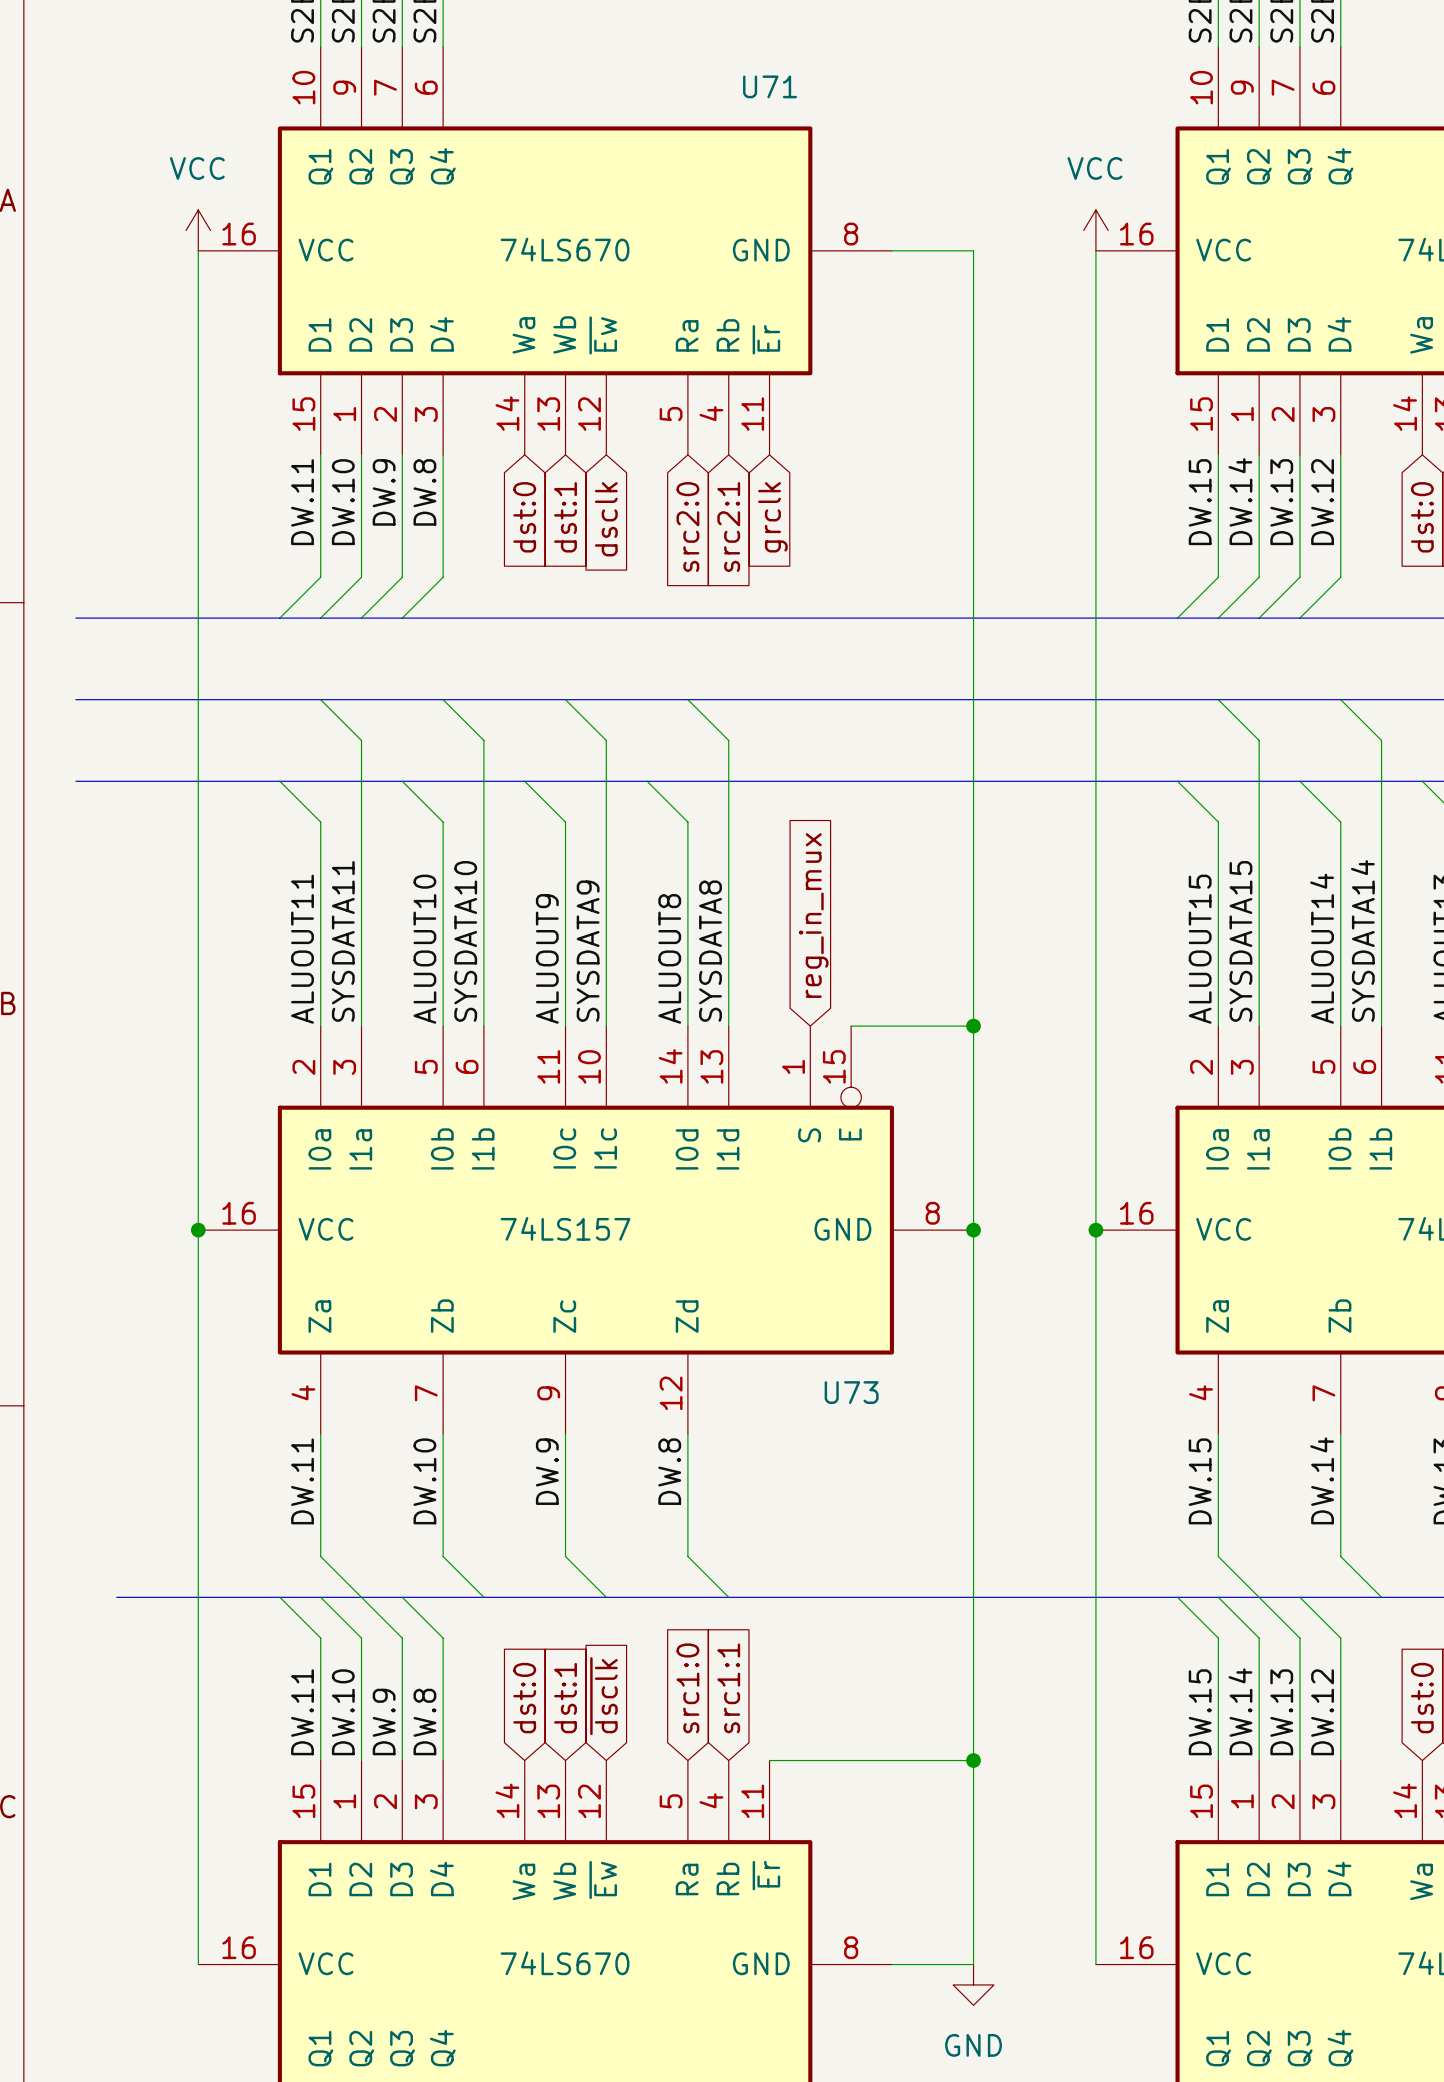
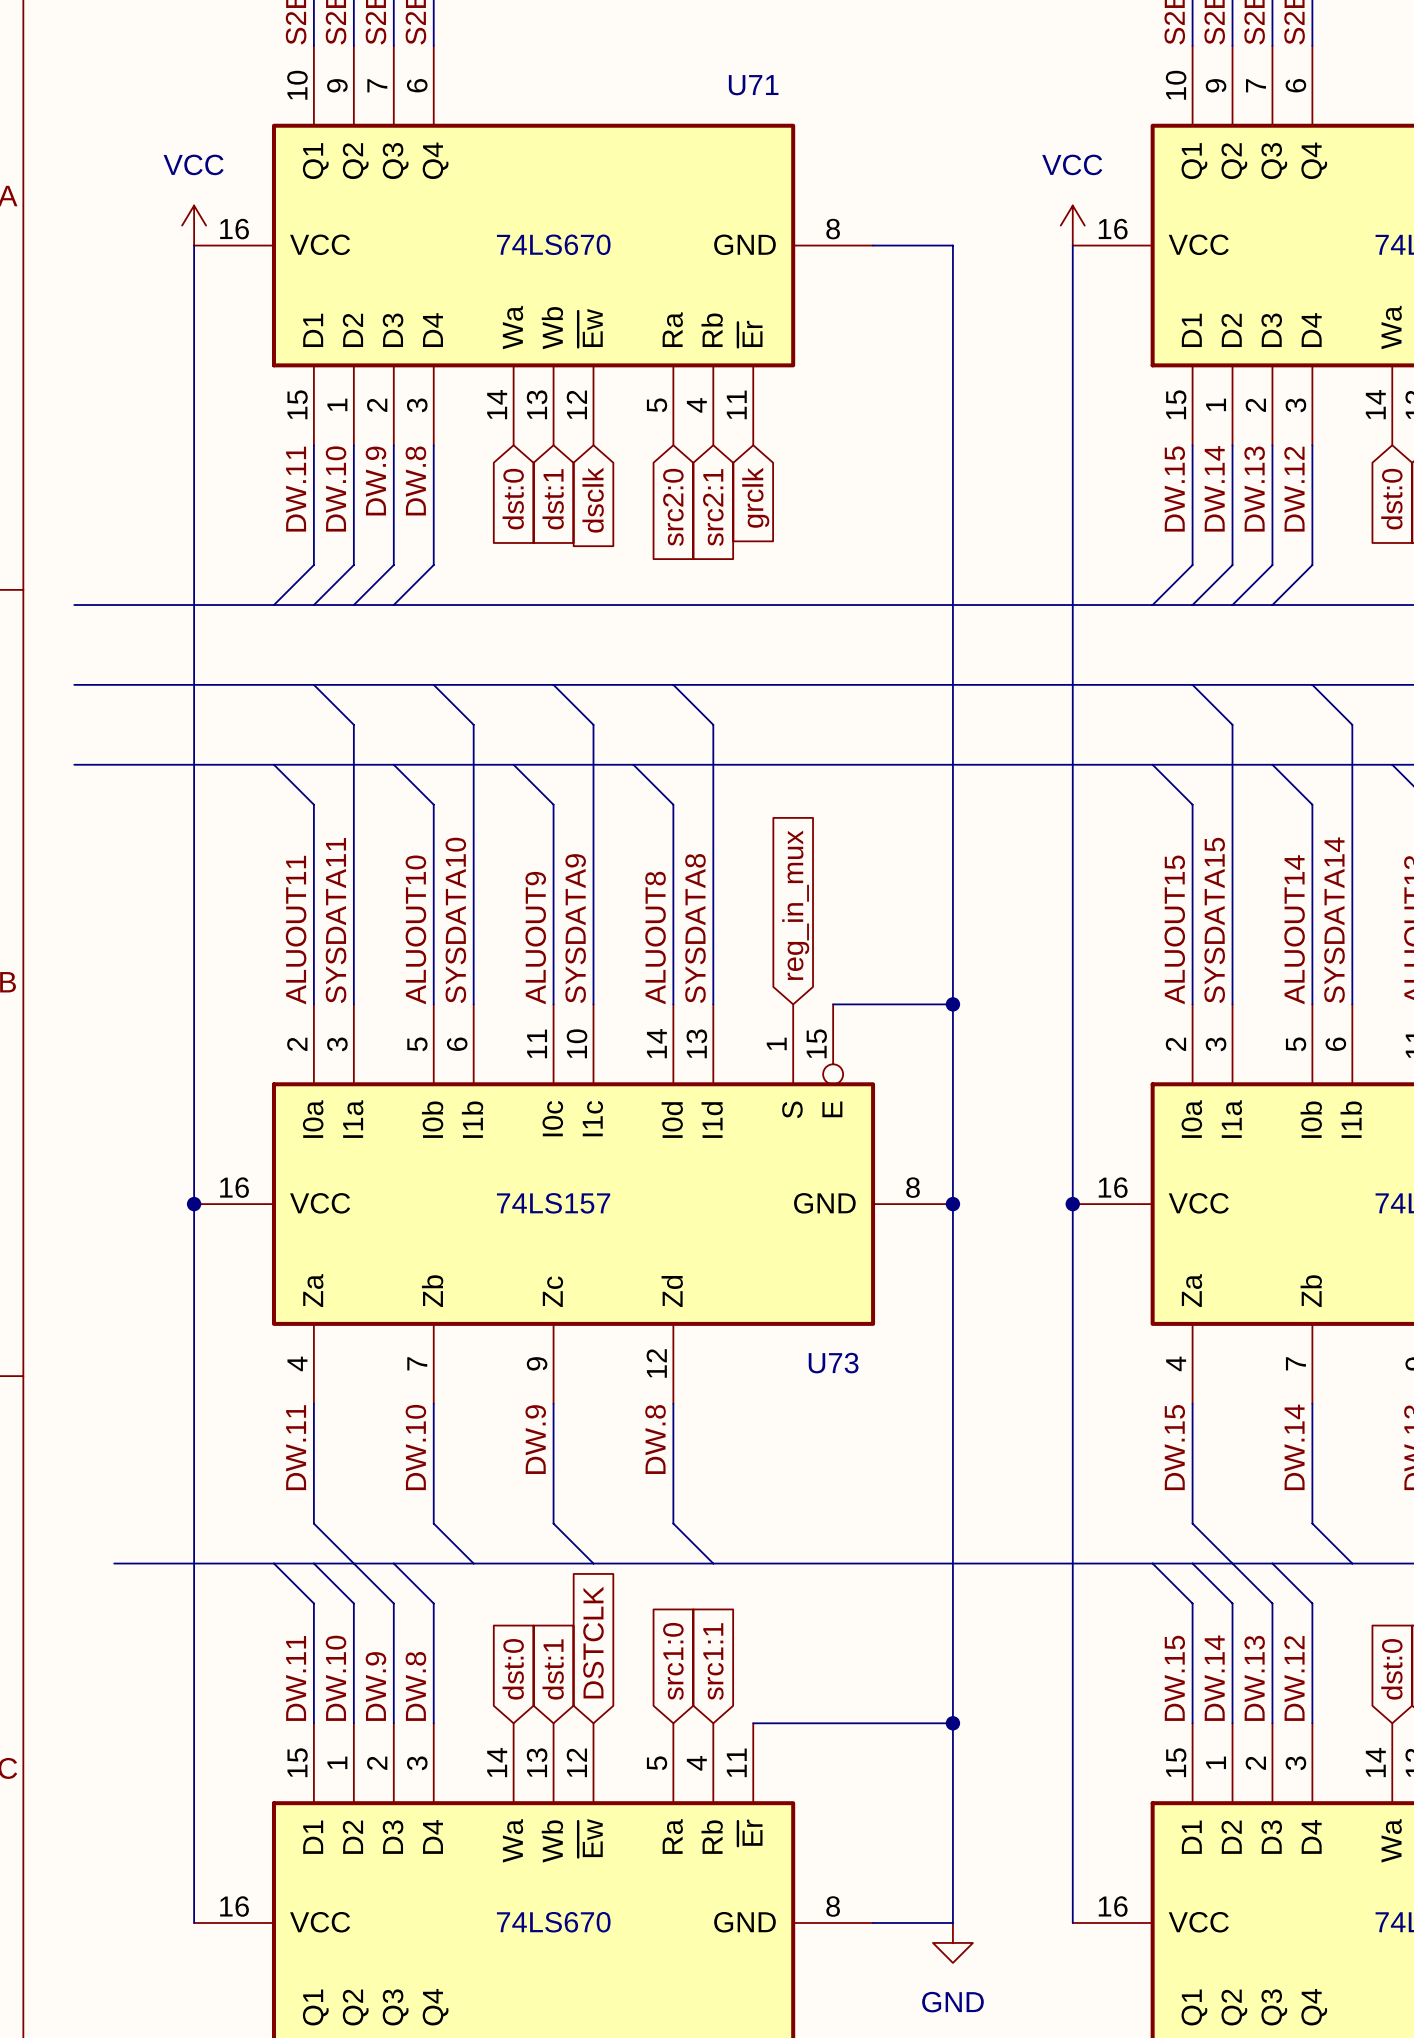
global label: ~{dsclk} (603, 1696) -> DSTCLK (593, 1642)

